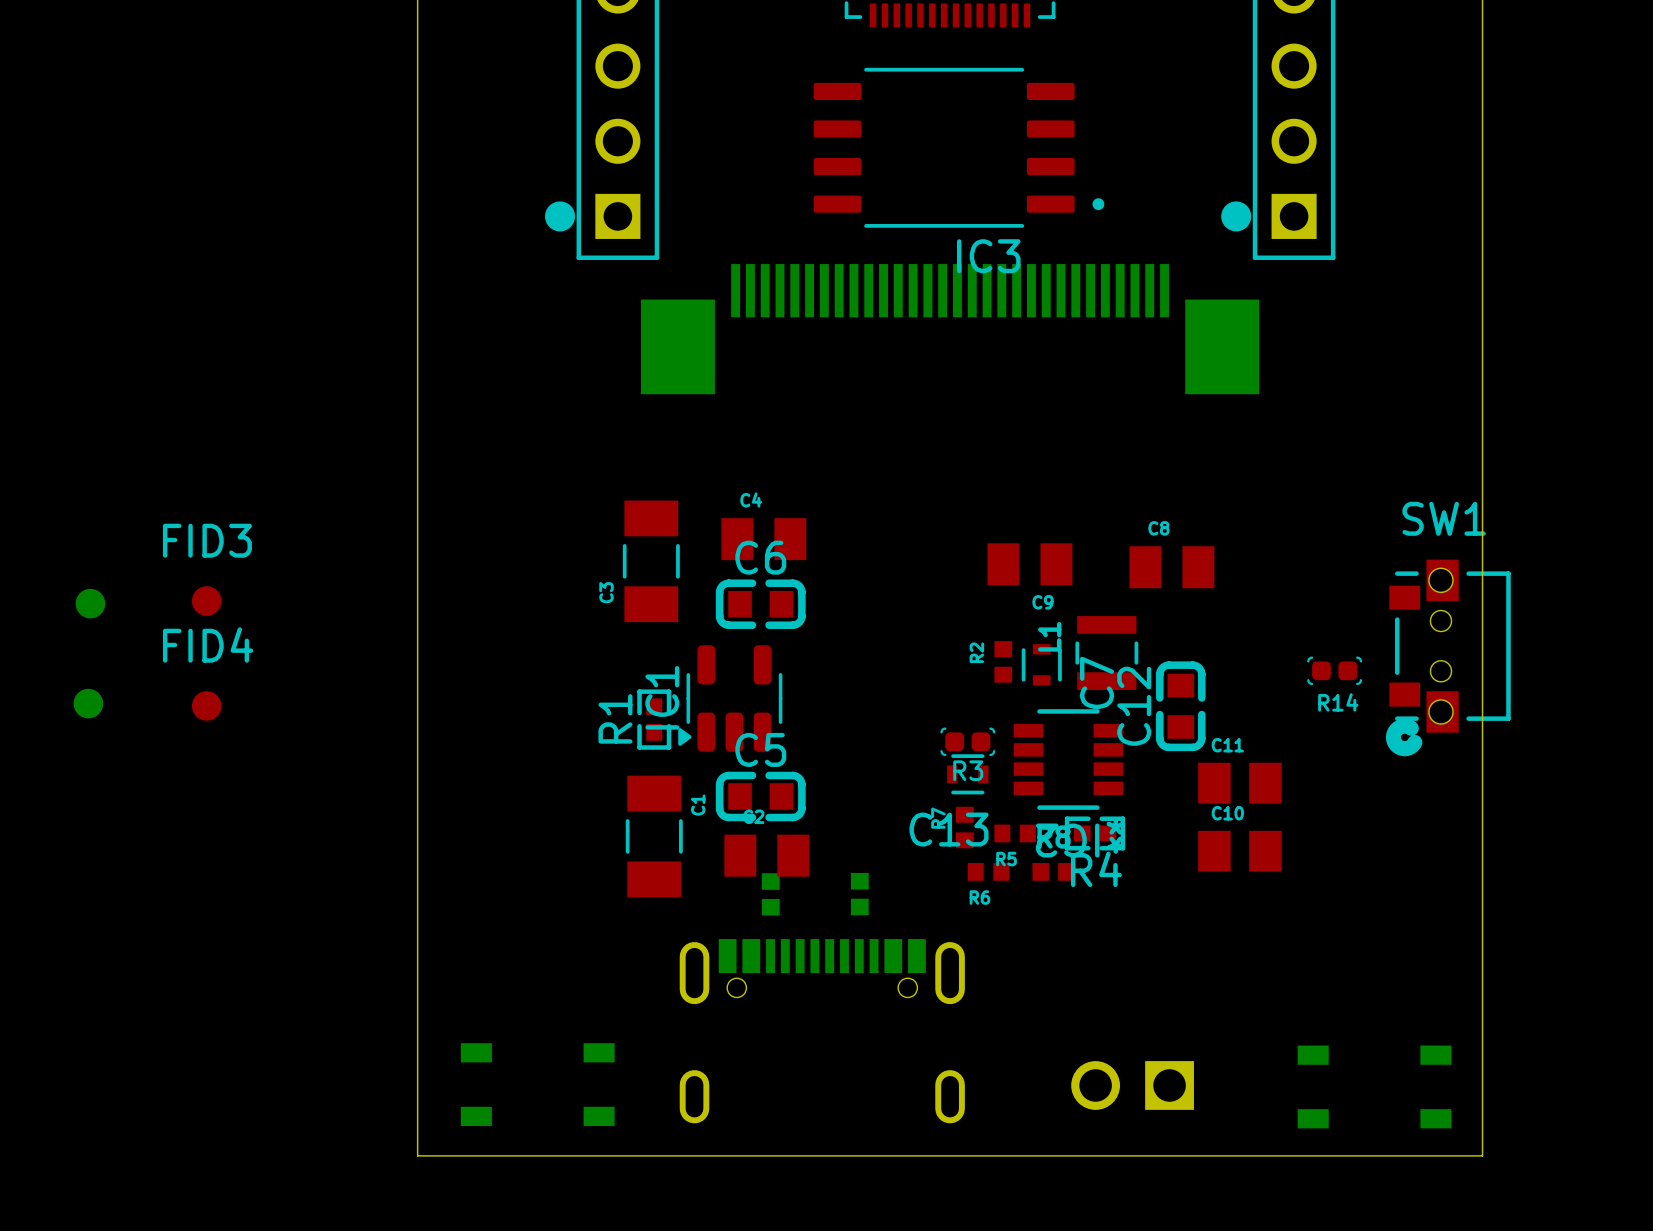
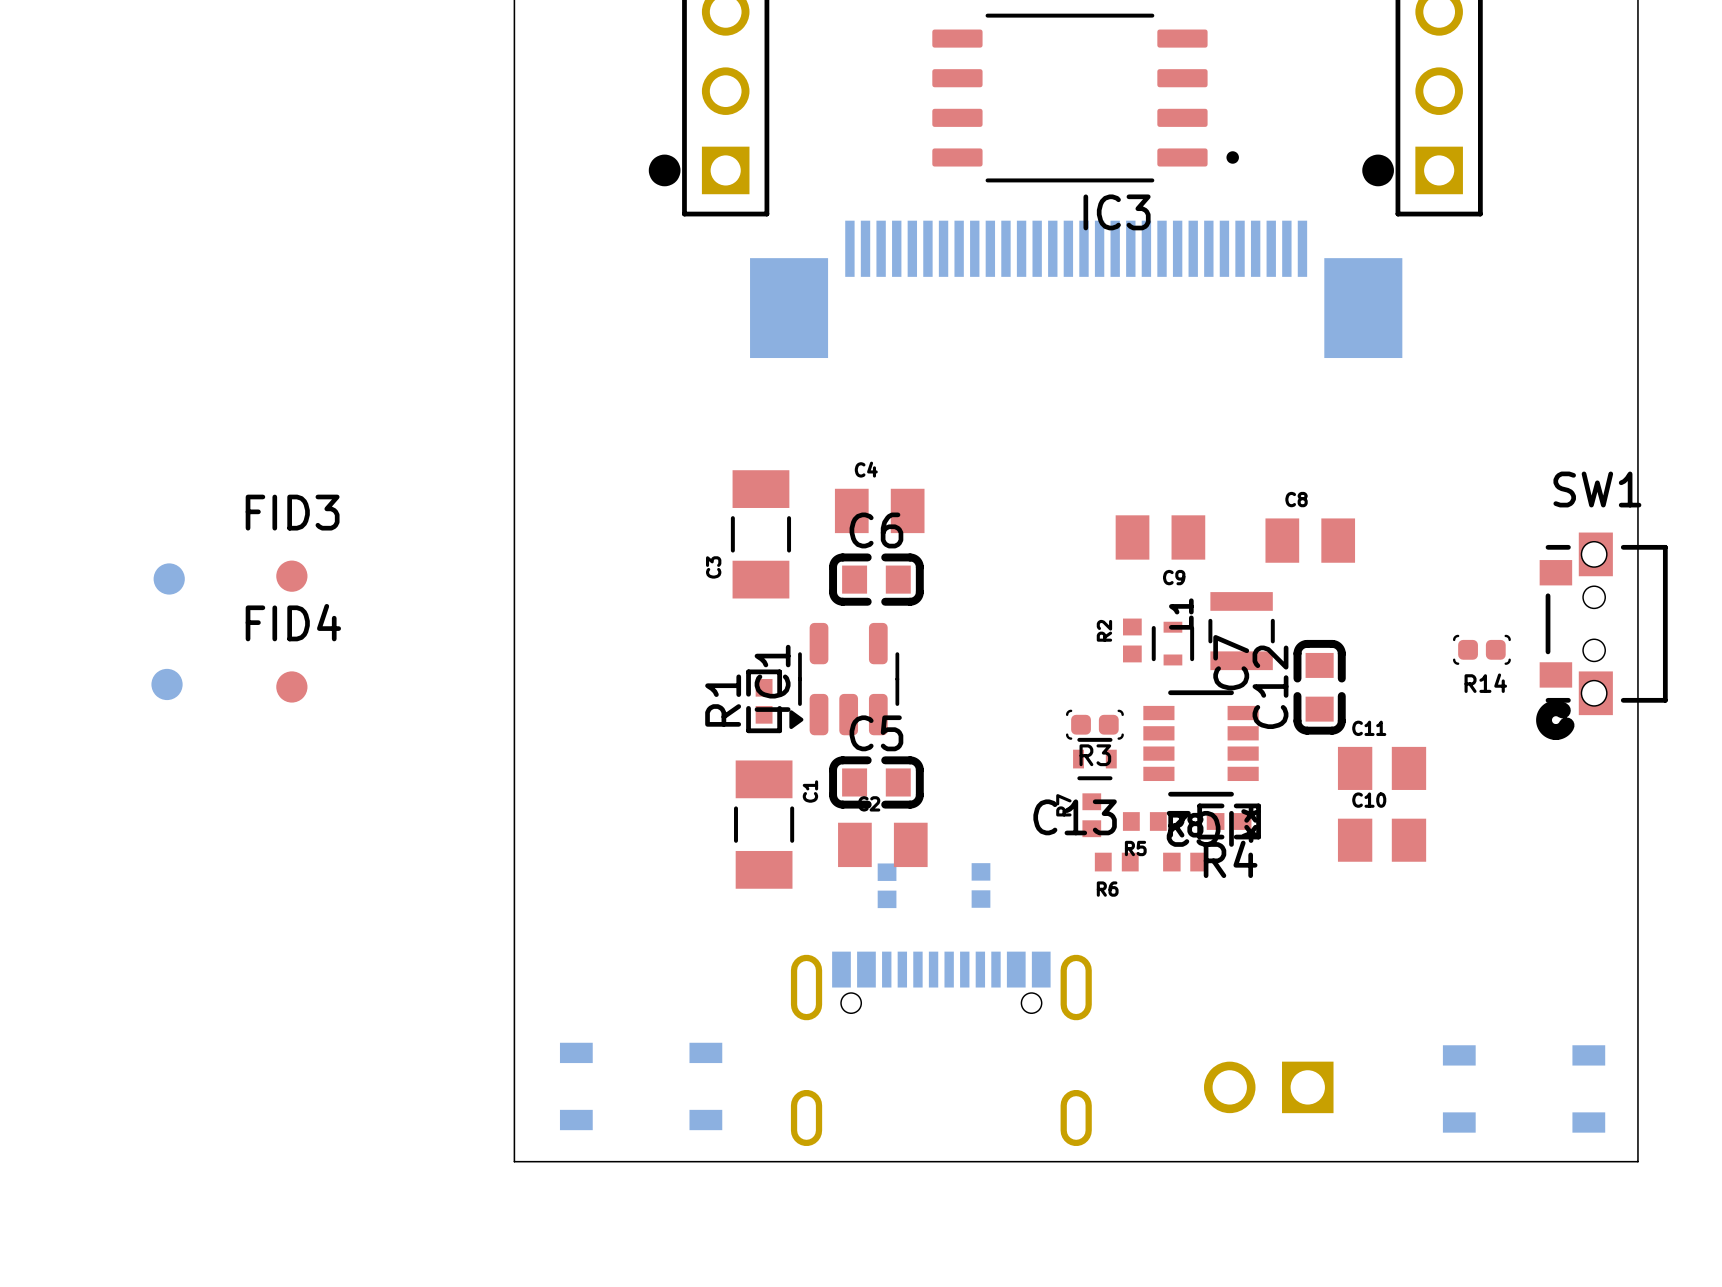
part position: (822, 1031) -> (941, 1048)

